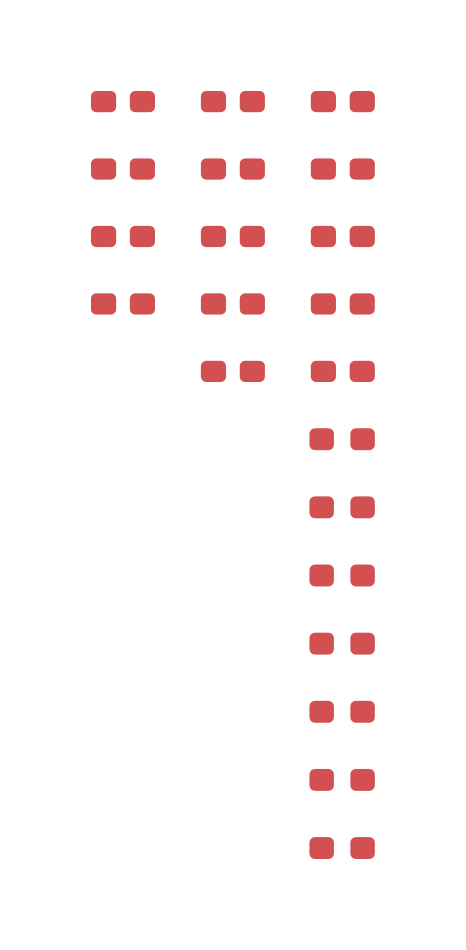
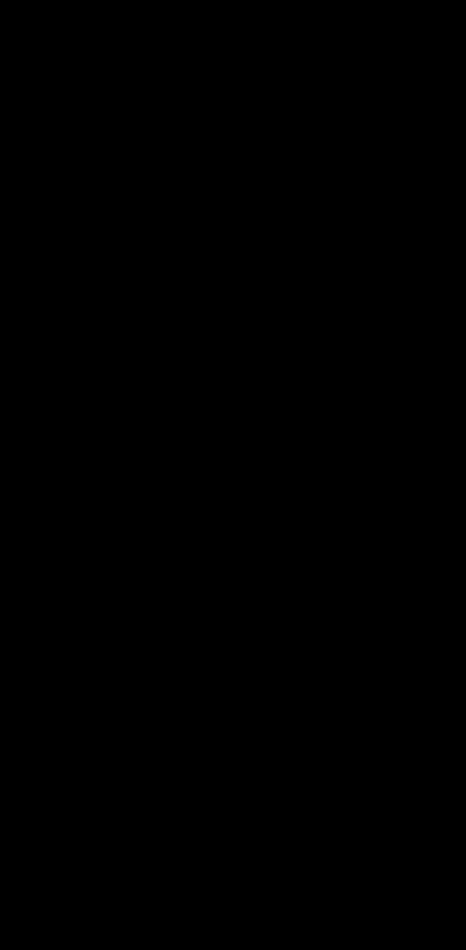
part: (122, 101) -> none
part: (232, 101) -> none
part: (342, 101) -> none
part: (122, 169) -> none
part: (232, 169) -> none
part: (342, 169) -> none
part: (122, 236) -> none
part: (232, 236) -> none
part: (342, 236) -> none
part: (122, 303) -> none
part: (232, 303) -> none
part: (342, 303) -> none
part: (232, 371) -> none
part: (342, 371) -> none
part: (342, 439) -> none
part: (342, 507) -> none
part: (342, 575) -> none
part: (342, 643) -> none
part: (342, 711) -> none
part: (342, 779) -> none
part: (342, 848) -> none

